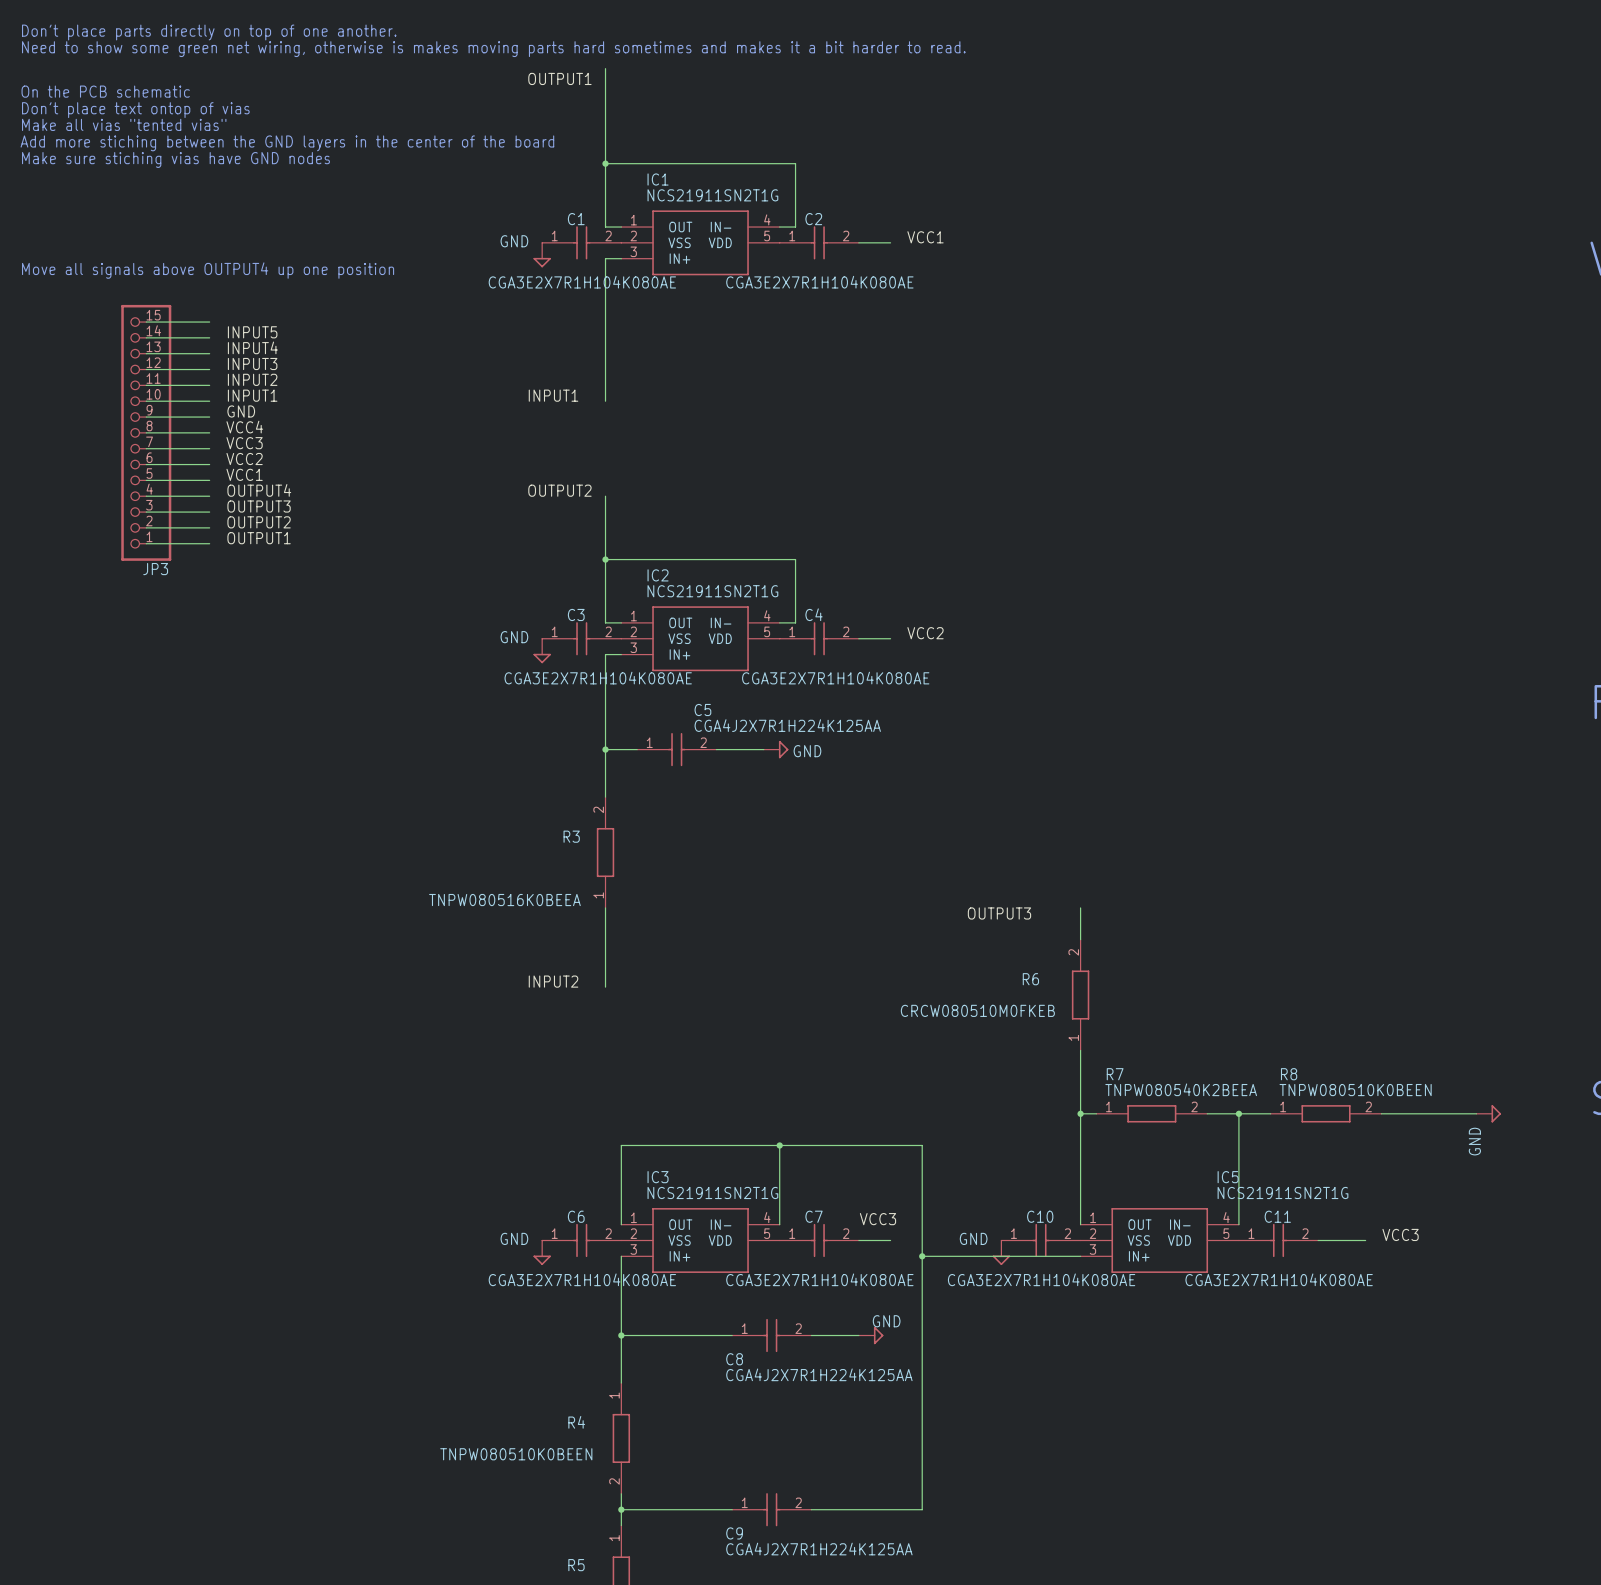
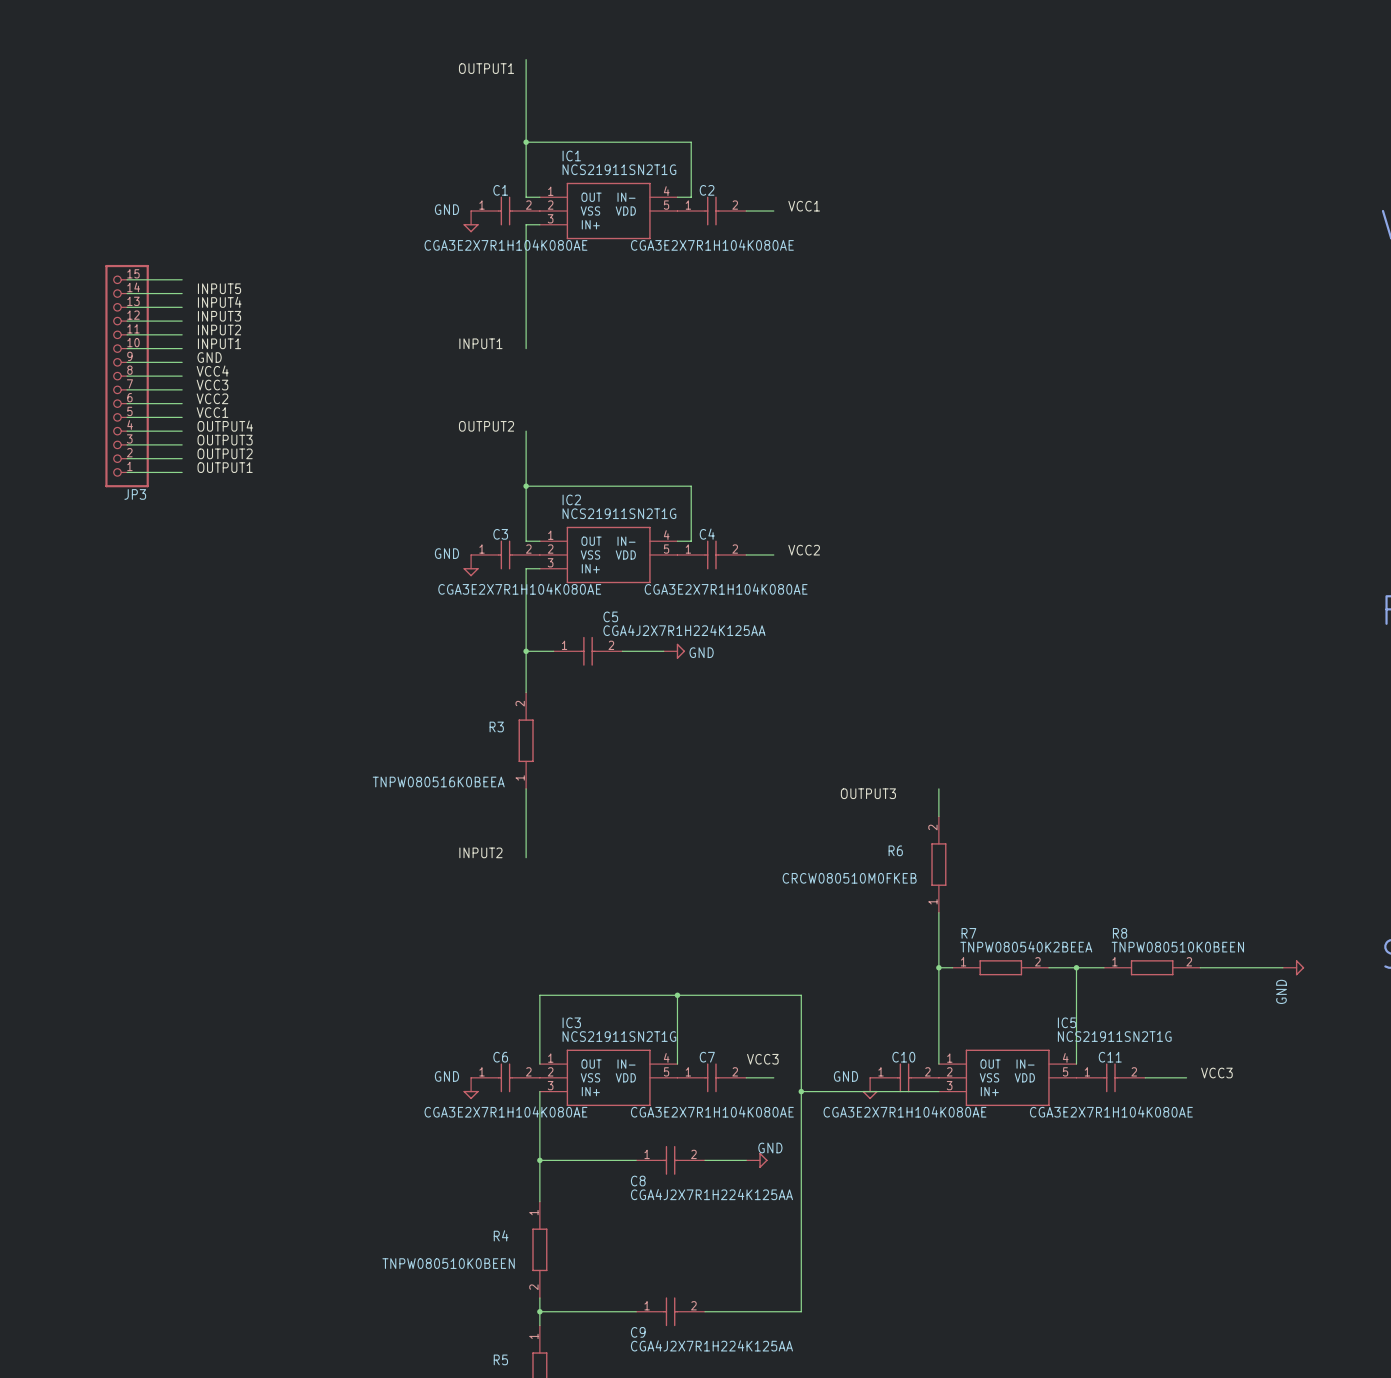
text: Don't place parts directly on top of one another. (209, 32) -> none
text: Need to show some green net wiring, otherwise is makes moving parts hard sometimes and makes it a bit harder to read. (493, 49) -> none
text: On the PCB schematic (105, 91) -> none
text: Don't place text ontop of vias (135, 110) -> none
text: Make all vias "tented vias" (124, 124) -> none
text: Add more stiching between the GND layers in the center of the board (287, 143) -> none
text: Make sure stiching vias have GND nodes (176, 159) -> none
text: Move all signals above OUTPUT4 up one position (208, 270) -> none

